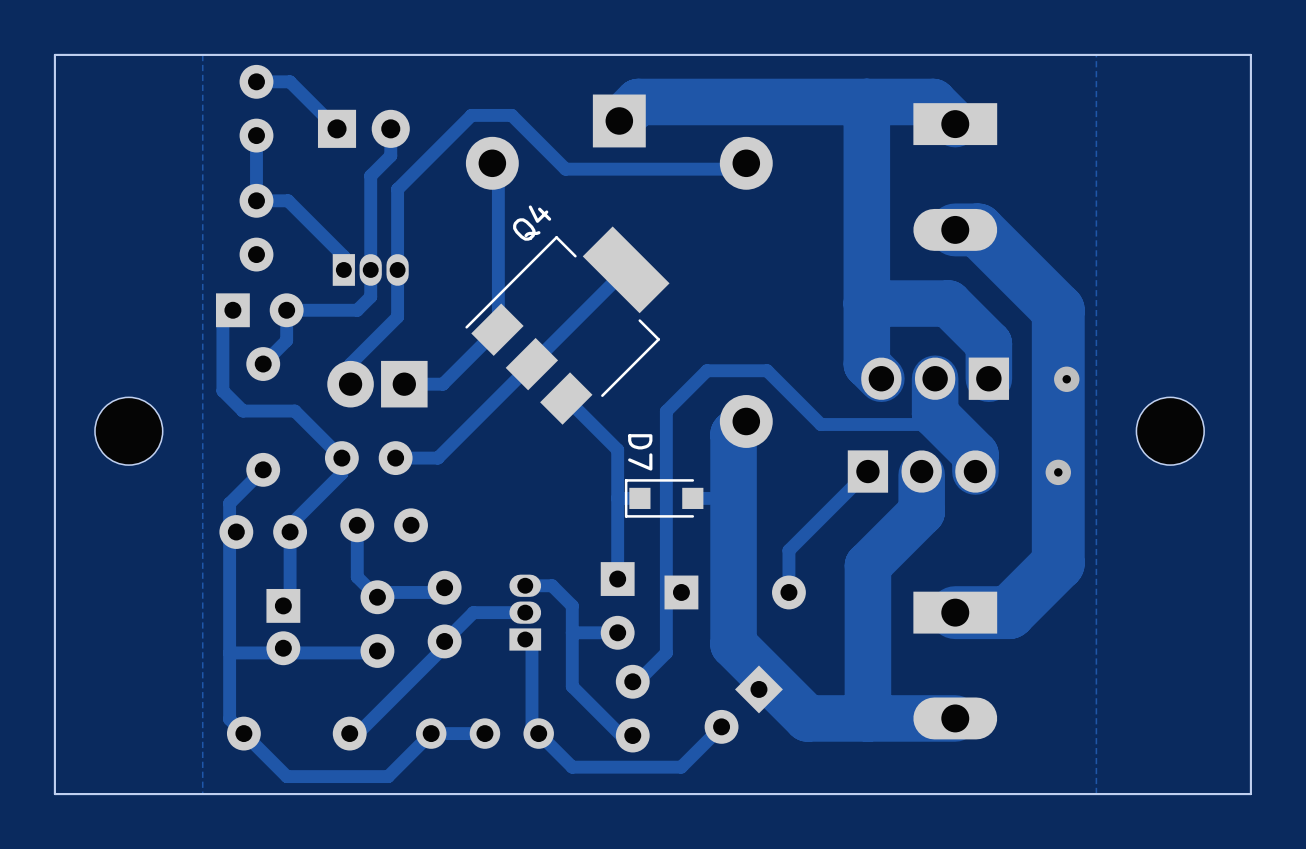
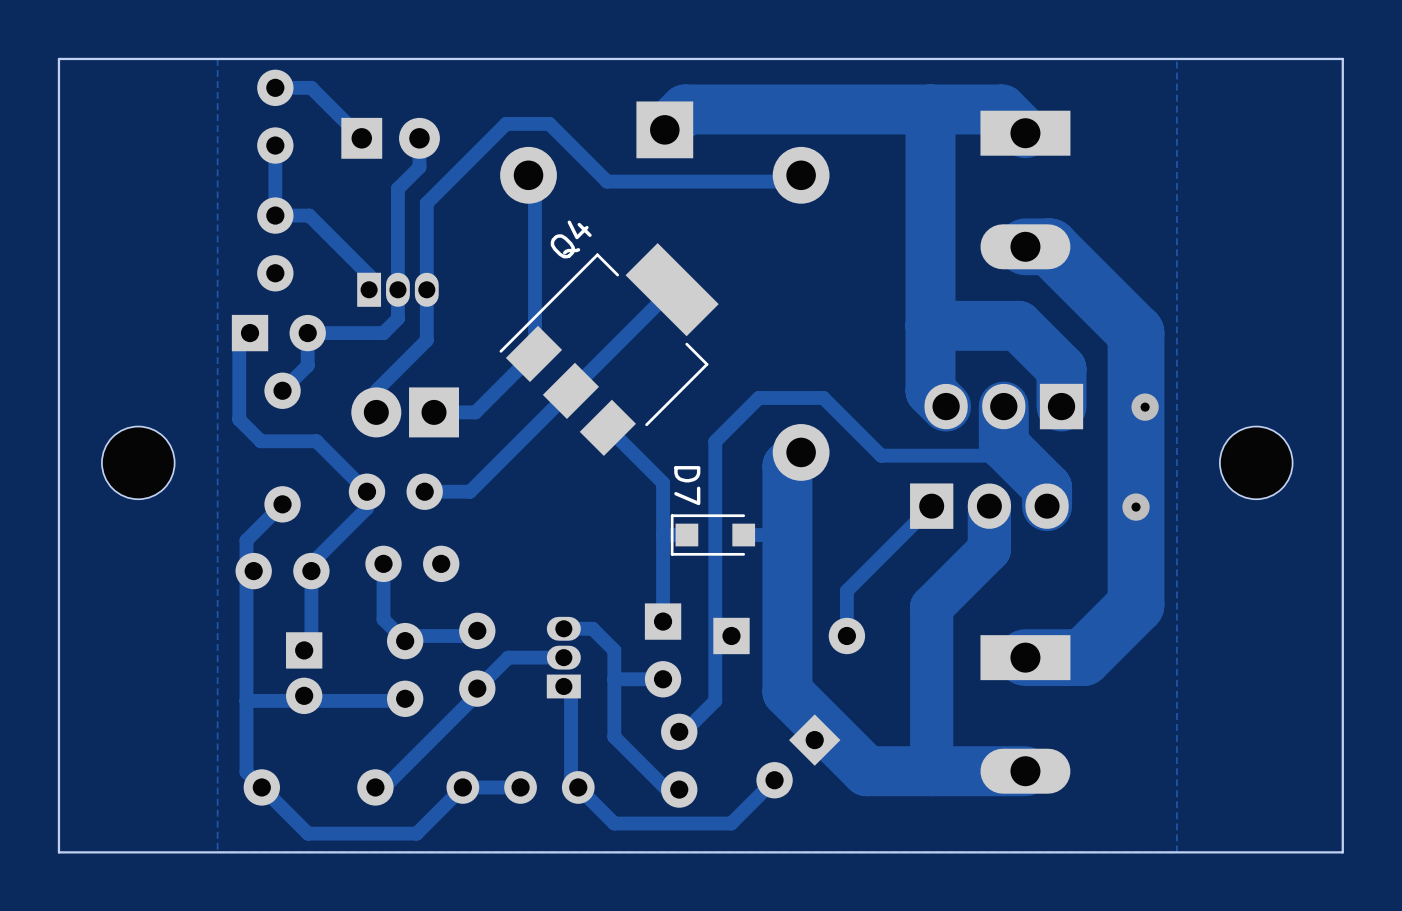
track width: thick (921, 474) (921, 511) (867, 565) (867, 718) -> thin (989, 509) (989, 549) (931, 607) (931, 771)

